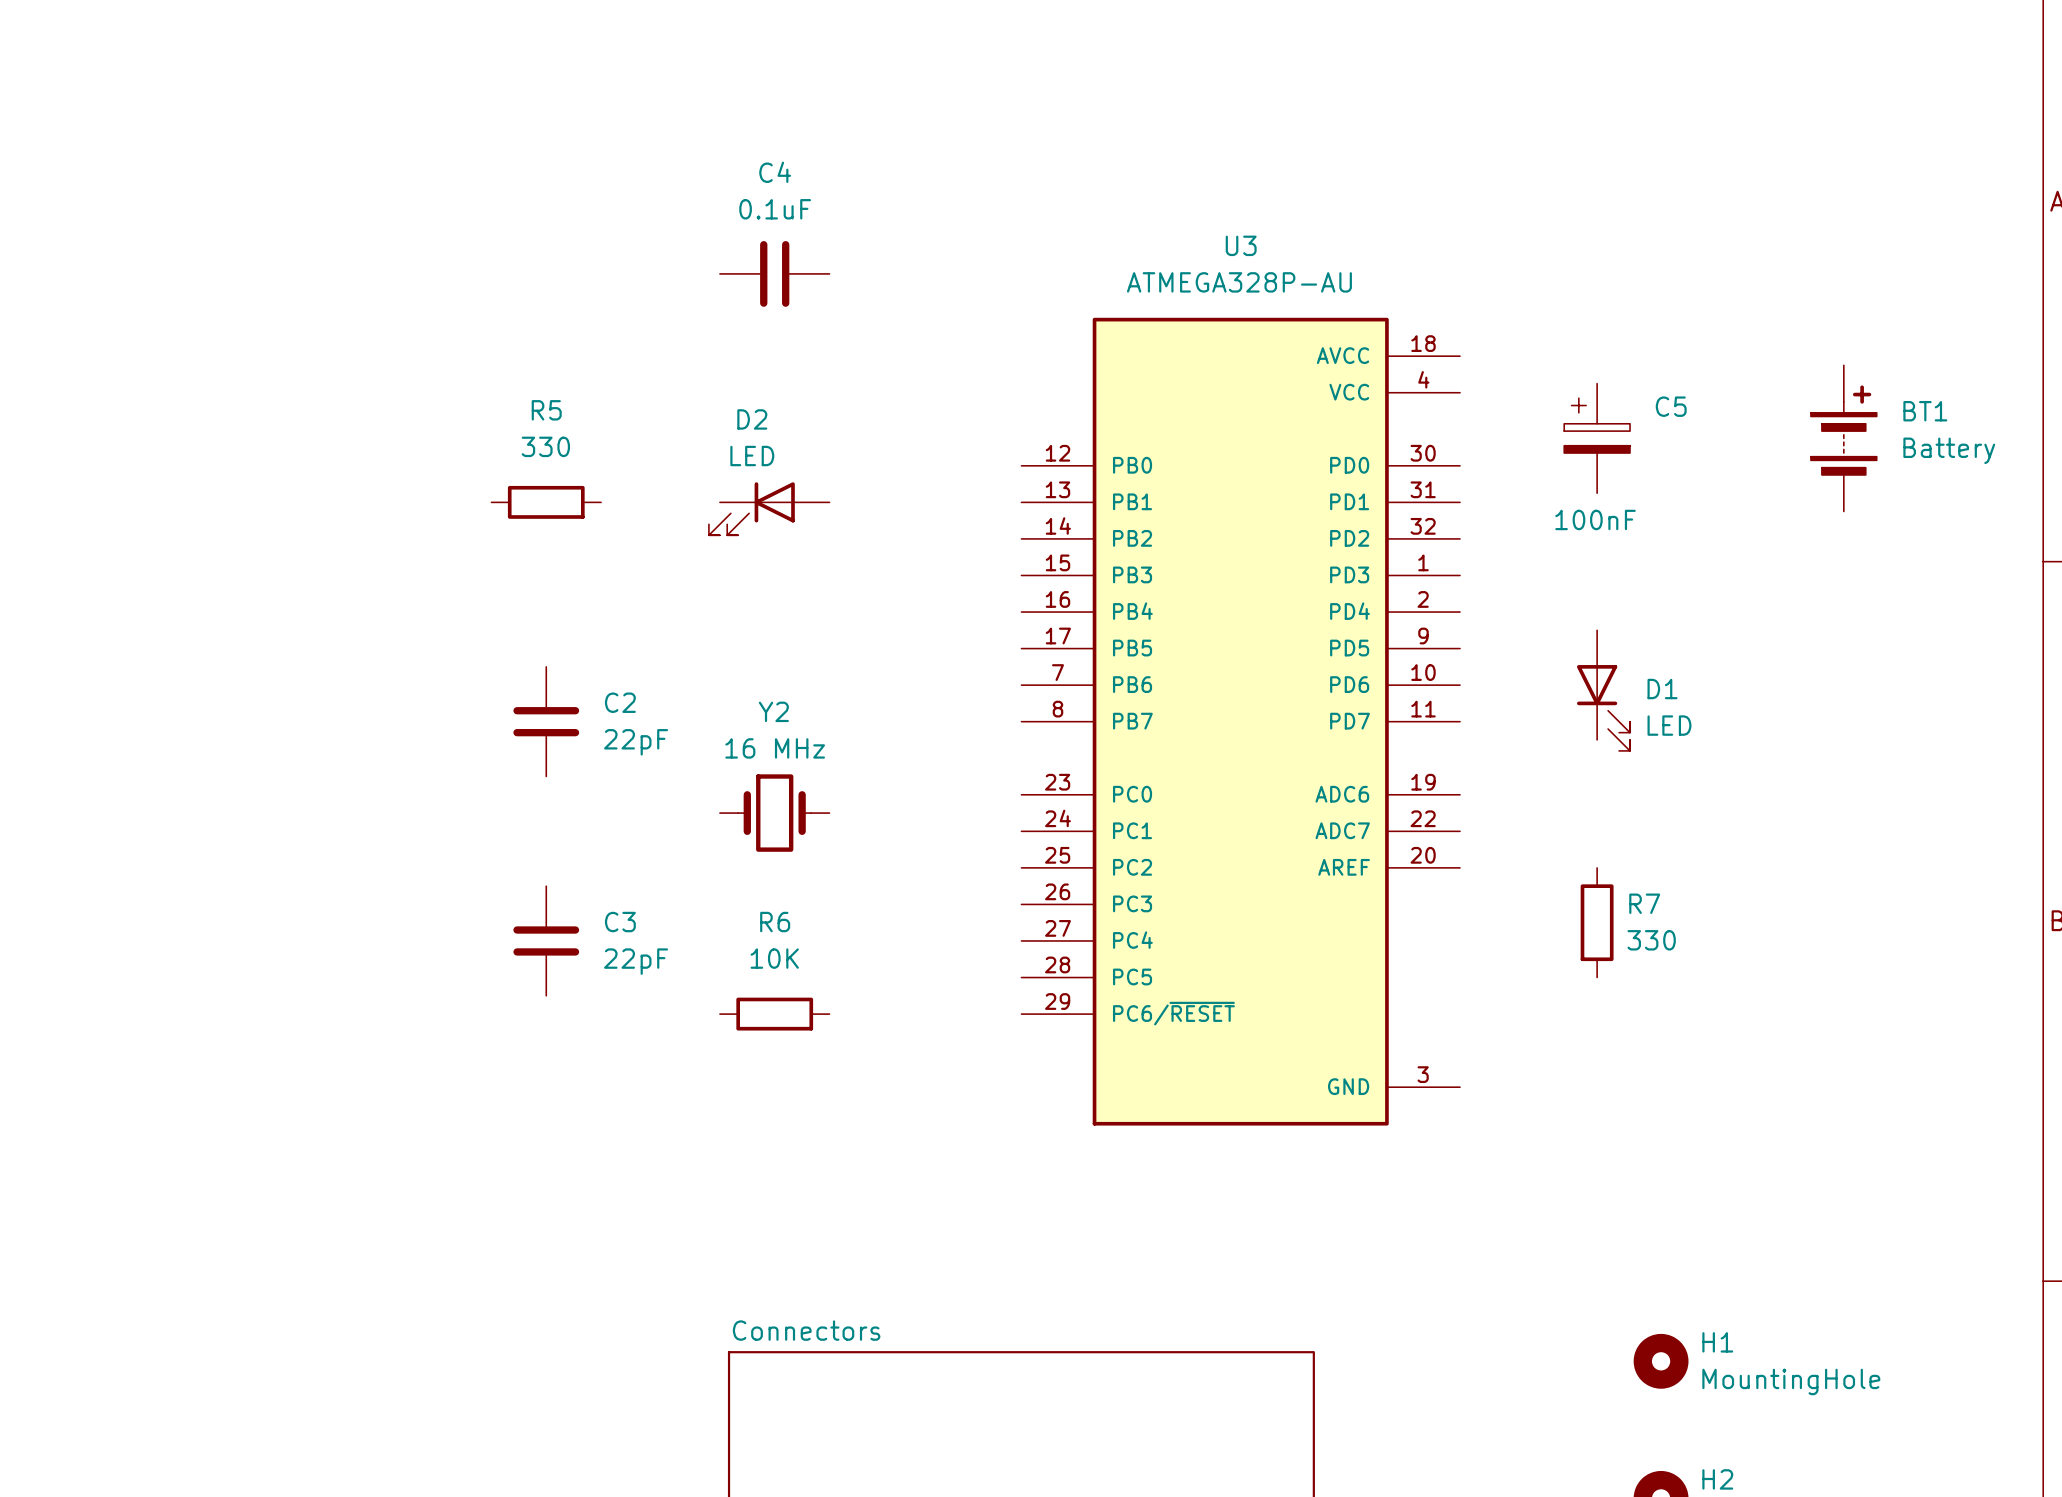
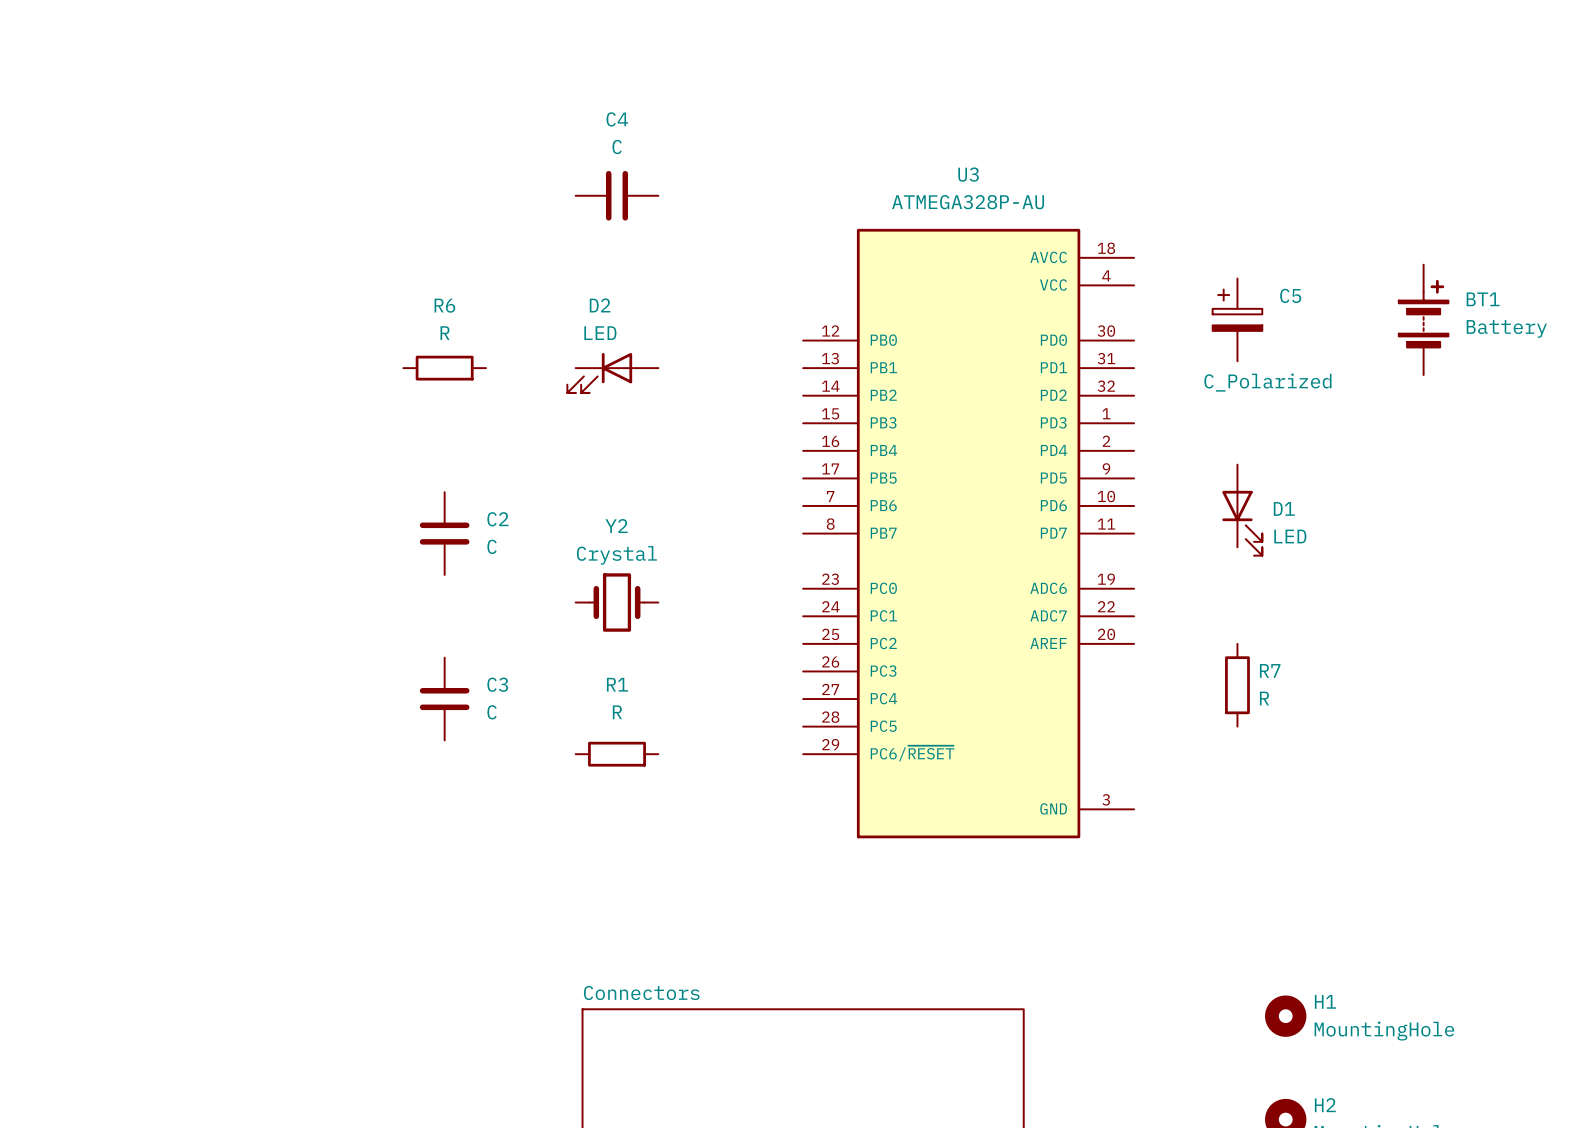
C4 value: 0.1uF (775, 209) -> C (617, 147)
R5 name: R5 (546, 410) -> R6 (444, 305)
R5 value: 330 (545, 446) -> R (445, 333)
C5 value: 100nF (1595, 519) -> C_Polarized (1267, 382)
C2 value: 22pF (636, 742) -> C (492, 546)
Y2 value: 16 MHz (775, 748) -> Crystal (616, 555)
R6 name: R6 (775, 922) -> R1 (617, 684)
R7 value: 330 (1651, 940) -> R (1264, 698)
R6 value: 10K (774, 958) -> R (617, 712)
C3 value: 22pF (636, 961) -> C (492, 712)

